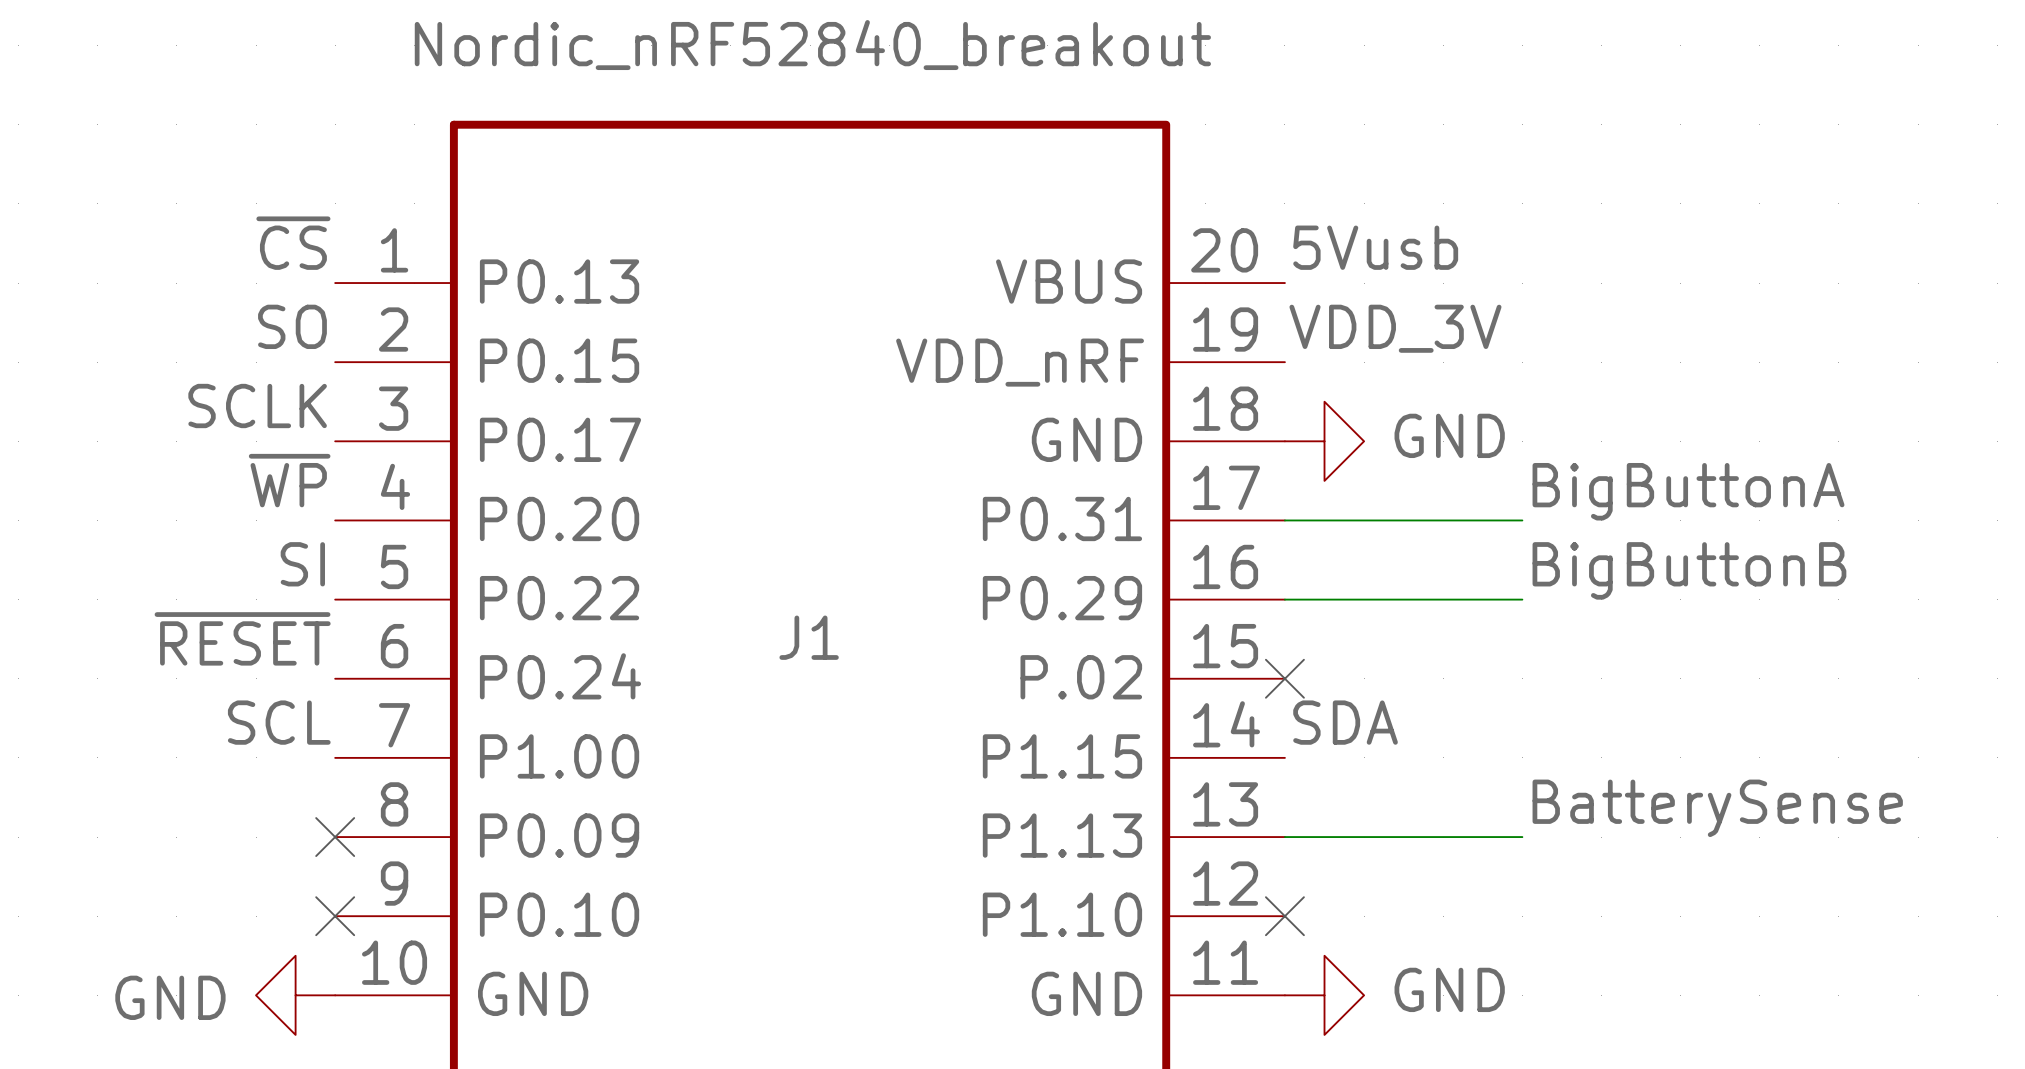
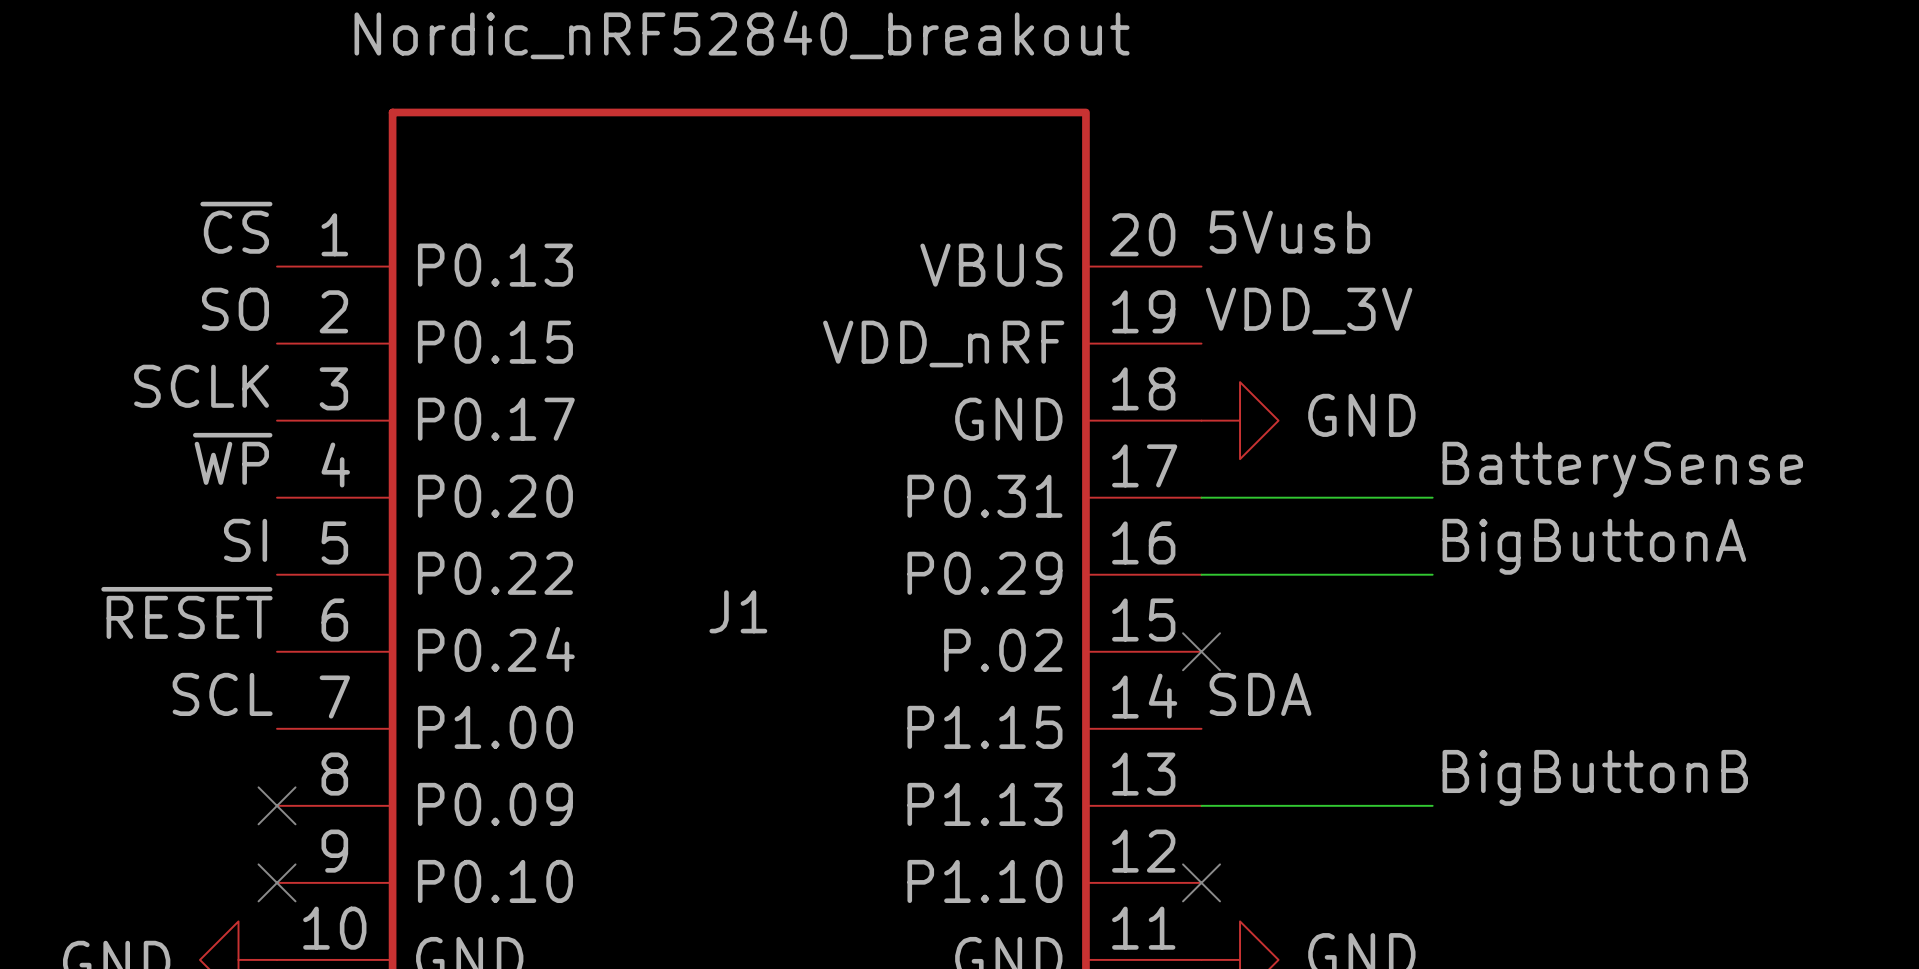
label: BigButtonA (1688, 491) -> BatterySense (1622, 469)
label: BigButtonB (1689, 570) -> BigButtonA (1594, 546)
label: BatterySense (1717, 808) -> BigButtonB (1595, 777)

